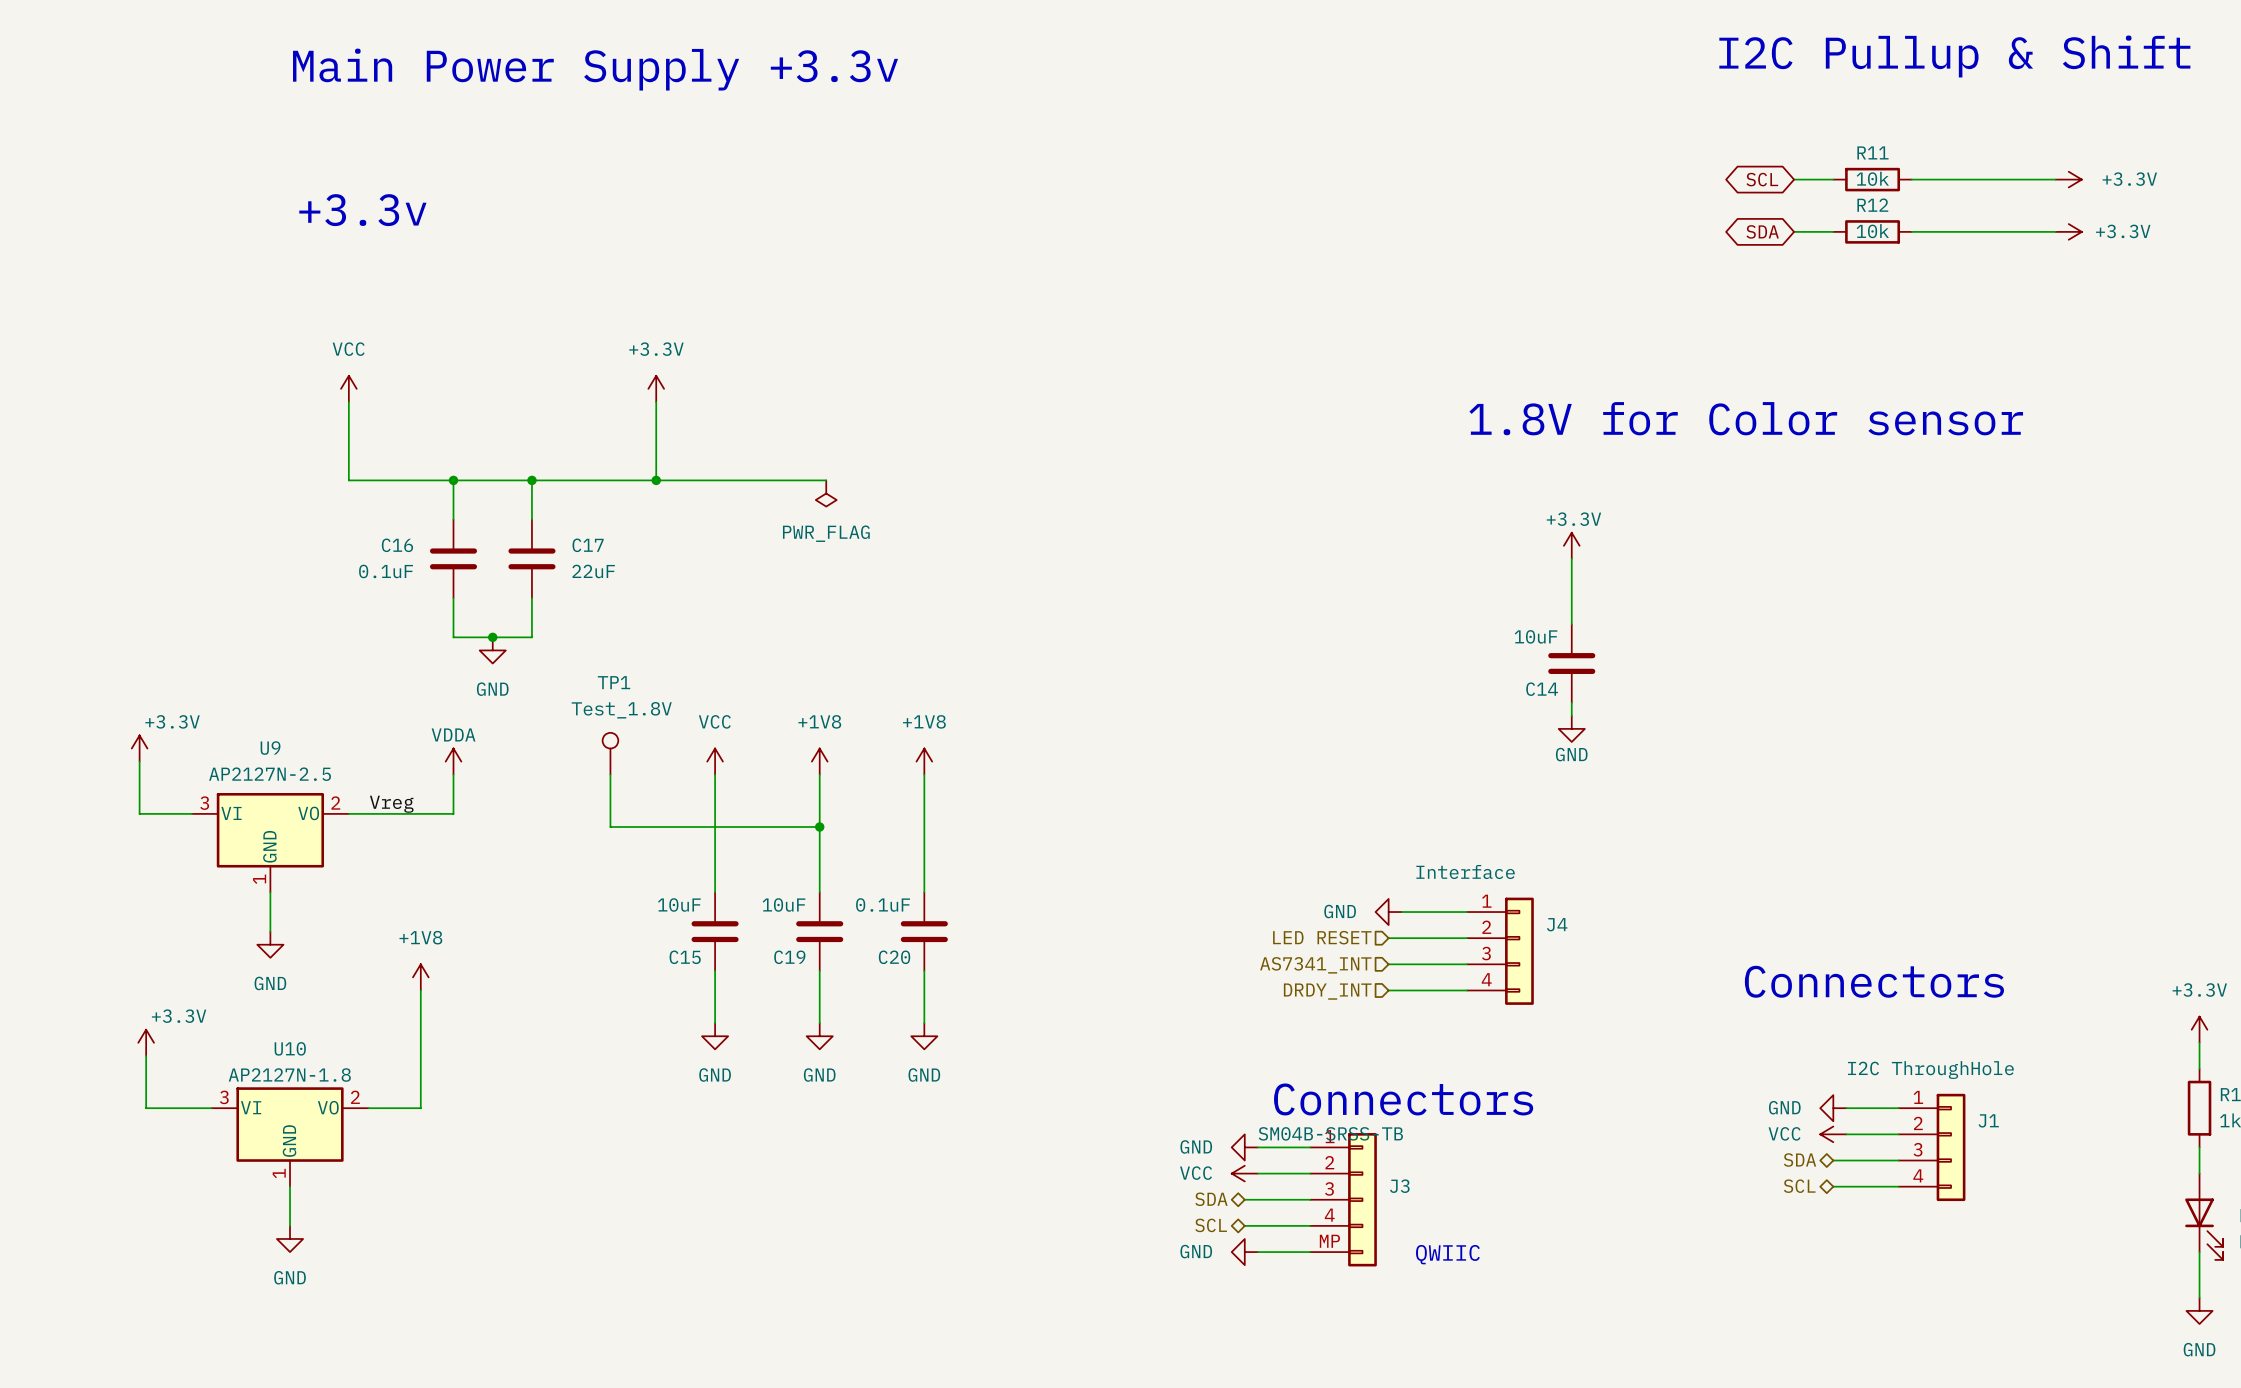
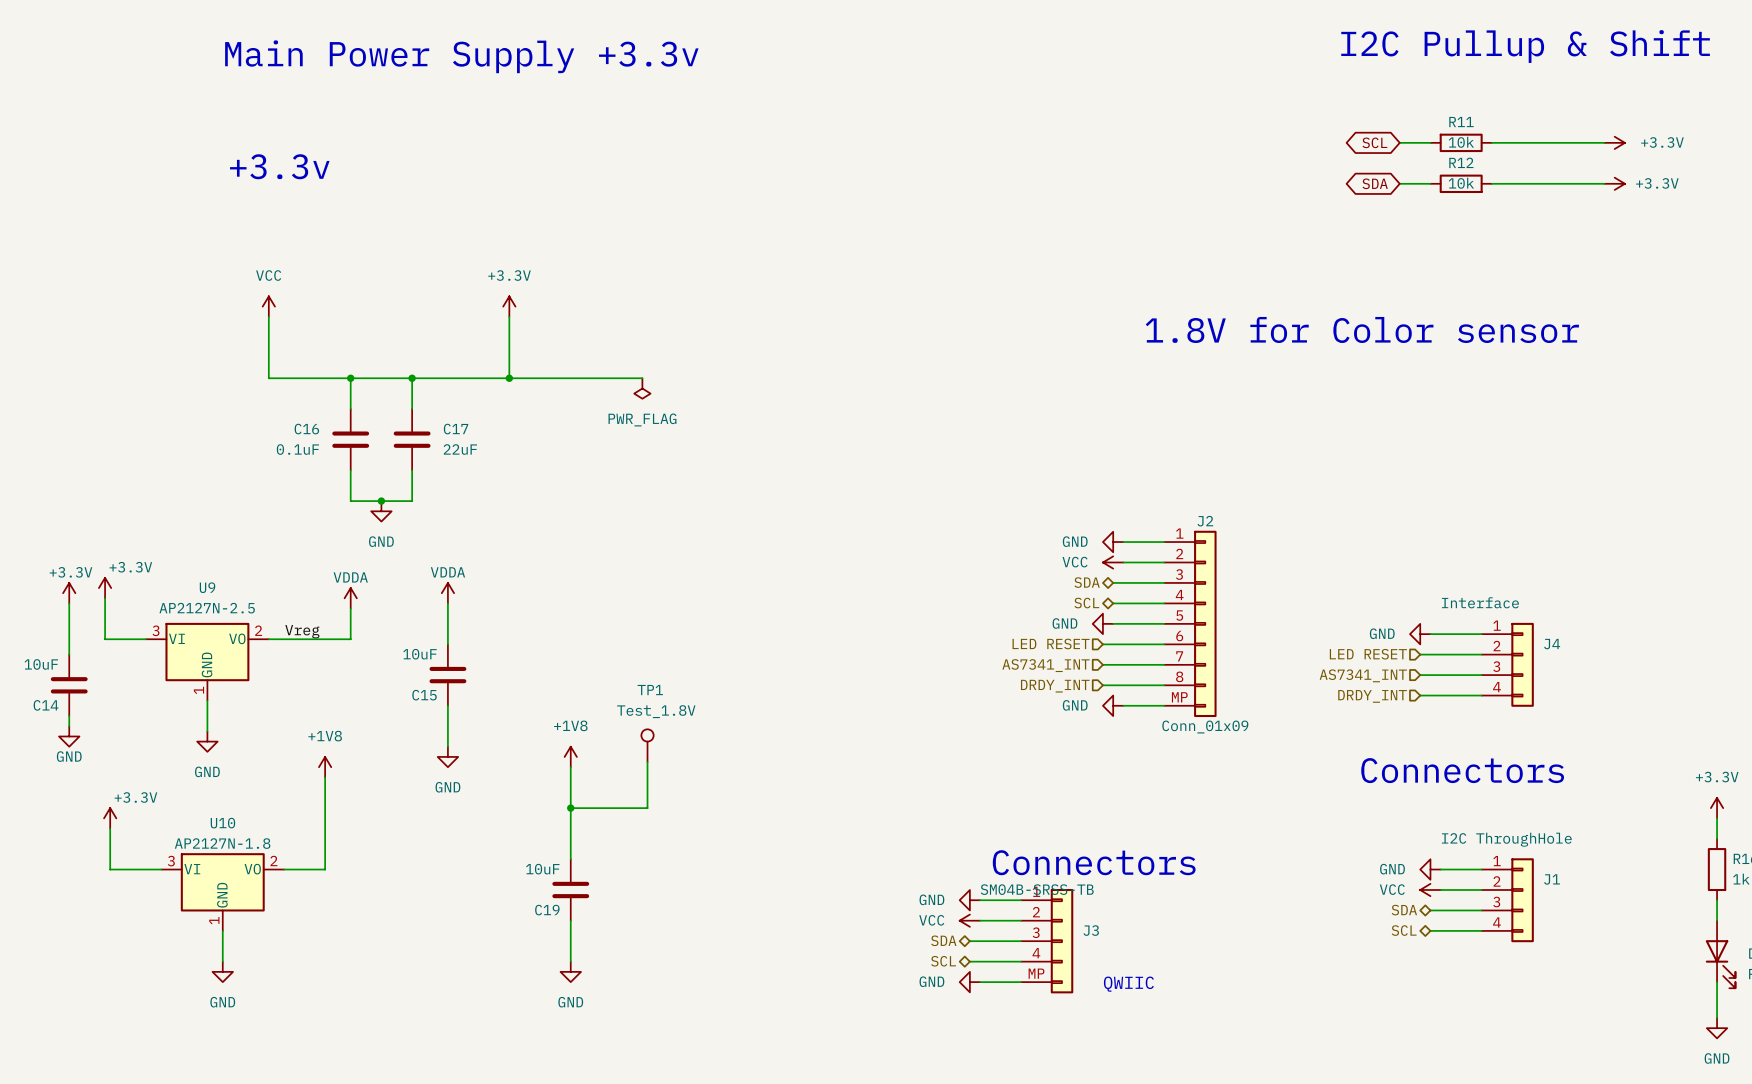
power symbol: +3.3V (1571, 545) -> none
wire: (1571, 558) (1571, 624) -> none
C14 position: (1571, 663) -> (69, 685)
power symbol: none -> GND (1113, 542)
wire: none -> (1123, 542) (1164, 542)
wire: (1571, 702) (1571, 715) -> none
power symbol: none -> VCC (1113, 562)
wire: none -> (1123, 562) (1164, 562)
power symbol: GND (1571, 728) -> none
hierarchical label: none -> SDA (1087, 582)
wire: none -> (1113, 582) (1164, 582)
TP1 position: (610, 753) -> (647, 745)
power symbol: none -> +3.3V (69, 593)
power symbol: none -> VDDA (447, 593)
power symbol: VCC (715, 761) -> none
power symbol: +1V8 (819, 761) -> none
power symbol: +1V8 (924, 761) -> none
hierarchical label: none -> SCL (1086, 603)
wire: none -> (69, 603) (69, 654)
wire: none -> (447, 603) (447, 644)
wire: none -> (1113, 603) (1164, 603)
wire: (610, 774) (610, 827) (819, 827) -> none
wire: (715, 774) (715, 892) -> (570, 767) (570, 859)
wire: (819, 774) (819, 892) -> none
wire: (924, 774) (924, 892) -> none
power symbol: none -> GND (1102, 623)
J2: none -> Conn_01x09 (1190, 623)
power symbol: none -> GND (1420, 634)
wire: none -> (1430, 634) (1481, 634)
junction: (819, 827) -> none
hierarchical label: none -> LED RESET (1368, 654)
wire: none -> (1420, 654) (1481, 654)
wire: none -> (1420, 675) (1481, 675)
hierarchical label: none -> AS7341_INT (1363, 675)
wire: none -> (1420, 695) (1481, 695)
hierarchical label: none -> DRDY_INT (1372, 696)
wire: none -> (1123, 705) (1164, 705)
wire: none -> (69, 716) (69, 726)
power symbol position: GND (1388, 912) -> GND (1113, 705)
wire: (1401, 912) (1467, 912) -> (1113, 623) (1164, 623)
C15 position: (715, 931) -> (447, 675)
C19 position: (819, 931) -> (570, 890)
C20: 0.1uF (924, 931) -> none
hierarchical label position: LED RESET (1322, 937) -> LED RESET (1051, 643)
power symbol: none -> GND (69, 736)
wire: (1388, 938) (1467, 938) -> (1102, 644) (1164, 644)
J4 position: (1500, 951) -> (1507, 664)
power symbol: none -> GND (447, 756)
power symbol: none -> +1V8 (570, 756)
wire: (1388, 964) (1467, 964) -> (1102, 664) (1164, 664)
hierarchical label position: AS7341_INT (1315, 965) -> AS7341_INT (1046, 665)
wire: (715, 970) (715, 1023) -> (570, 920) (570, 961)
wire: (819, 970) (819, 1023) -> (447, 705) (447, 746)
wire: none -> (647, 762) (647, 808) (570, 808)
wire: (924, 970) (924, 1023) -> none
wire: (1388, 990) (1467, 990) -> (1102, 685) (1164, 685)
hierarchical label position: DRDY_INT (1327, 991) -> DRDY_INT (1055, 686)
junction: none -> (570, 808)
power symbol: GND (715, 1036) -> none
power symbol: GND (819, 1036) -> none
power symbol: GND (924, 1036) -> none
power symbol: none -> GND (570, 971)

